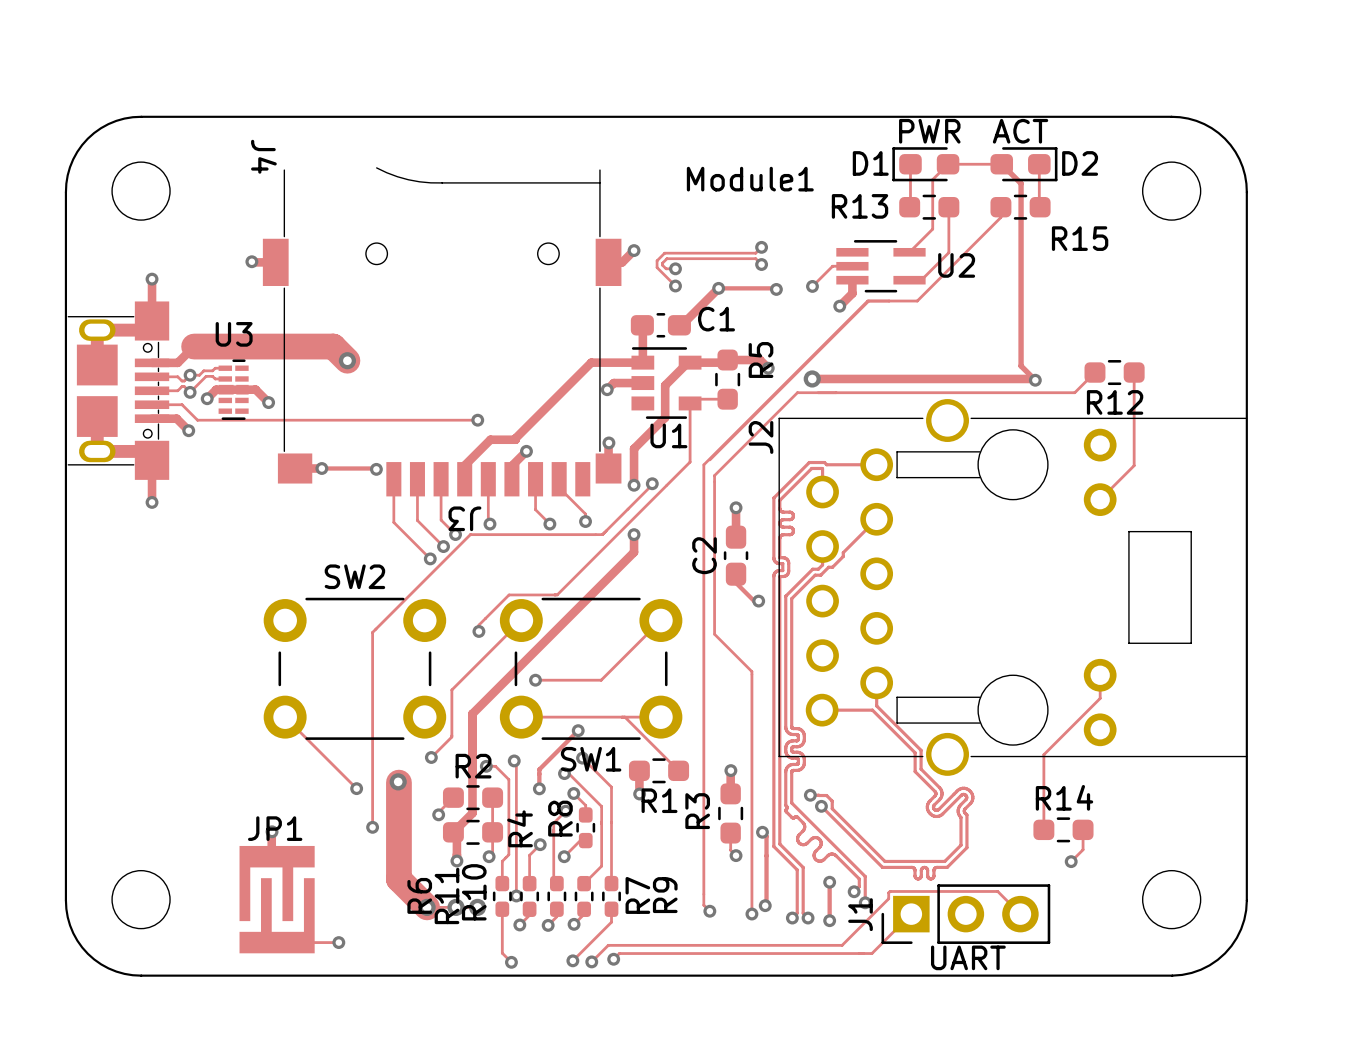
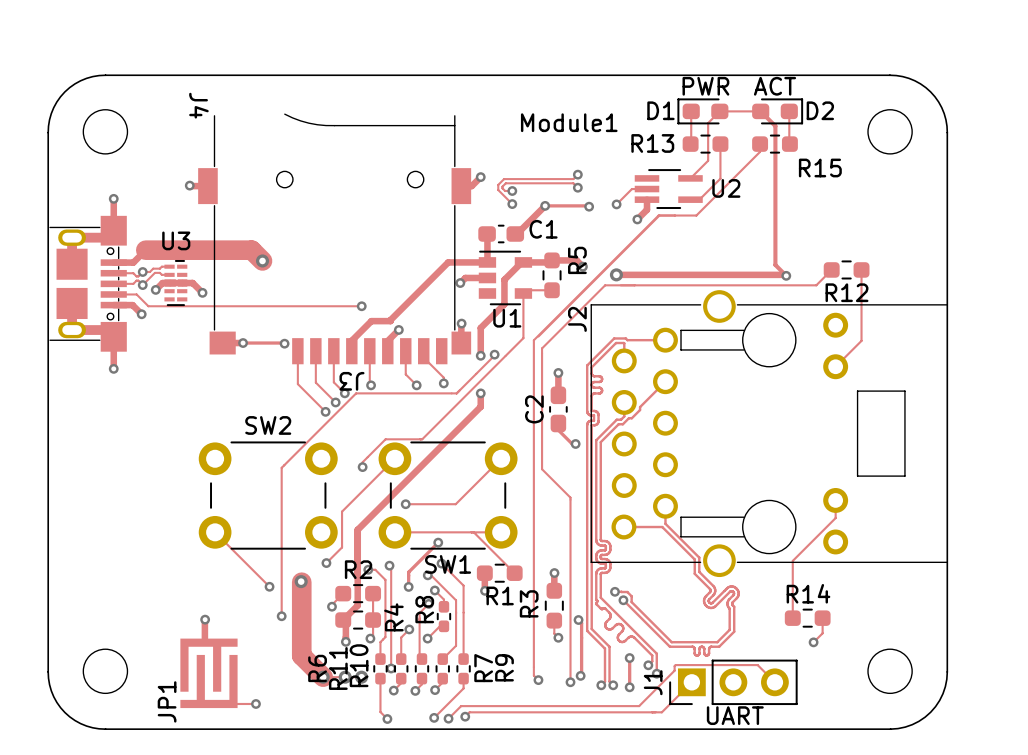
JP1 name rotation: 0° (275, 828) -> 90° counterclockwise (167, 701)
JP1 name position: JP1 (275, 828) -> JP1 (167, 701)
JP1 footprint: [239, 845, 315, 954] -> [180, 638, 238, 709]

